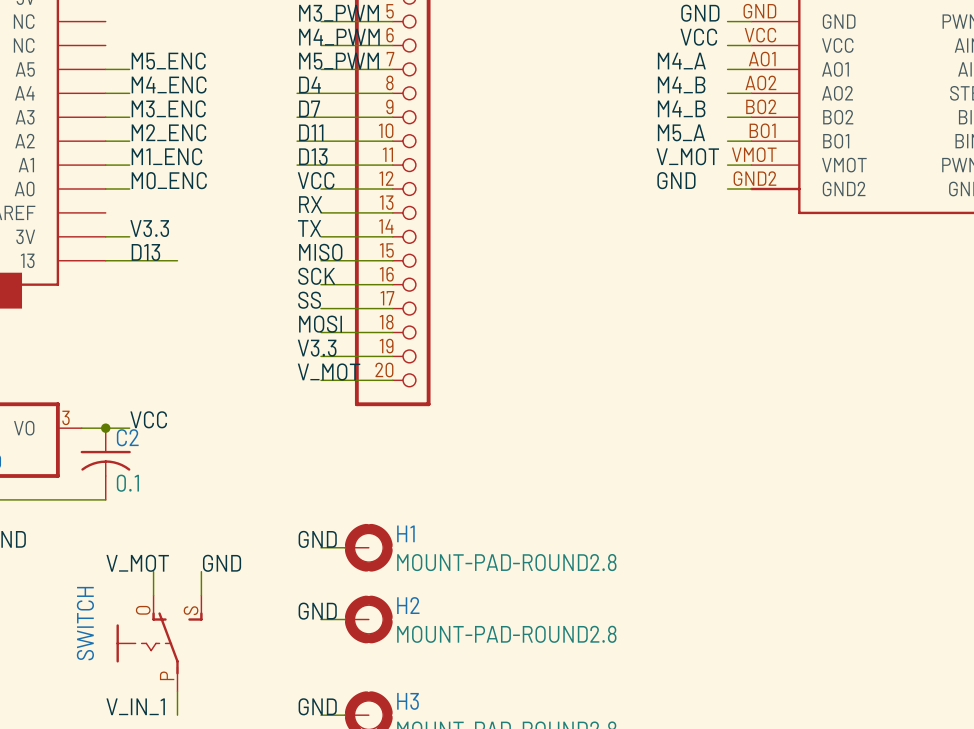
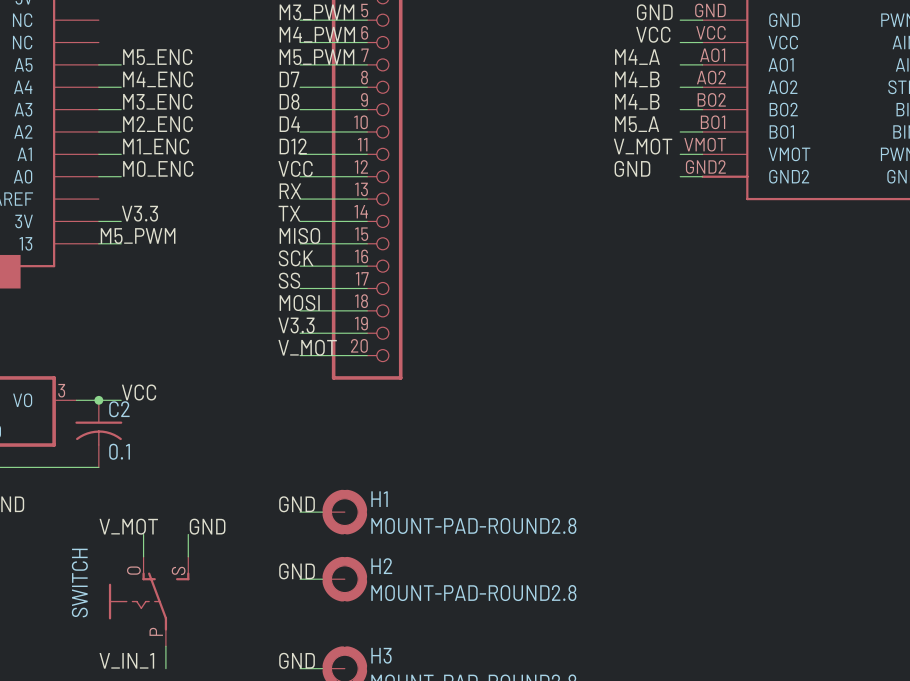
label: D4 (310, 84) -> D7 (289, 79)
wire: (297, 93) (320, 93) -> none
label: D7 (309, 108) -> D8 (289, 101)
wire: (297, 117) (320, 117) -> none
label: D11 (311, 132) -> D4 (289, 124)
wire: (297, 141) (320, 141) -> none
label: D13 (313, 156) -> D12 (293, 146)
wire: (297, 165) (320, 165) -> none
label: D13 (145, 252) -> none
label: none -> M5_PWM (138, 236)
wire: (129, 260) (177, 260) -> none

